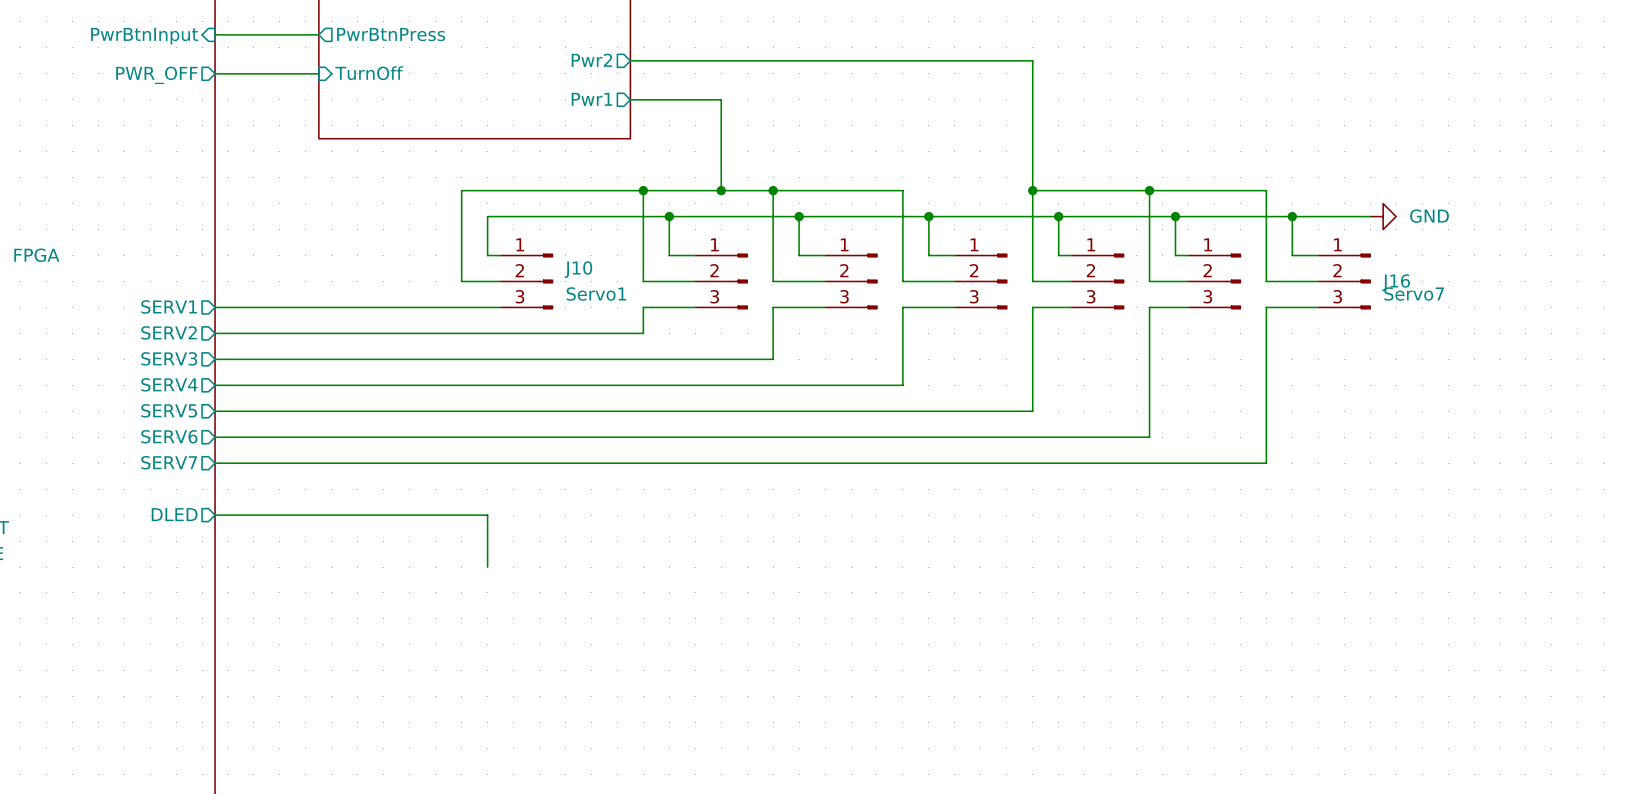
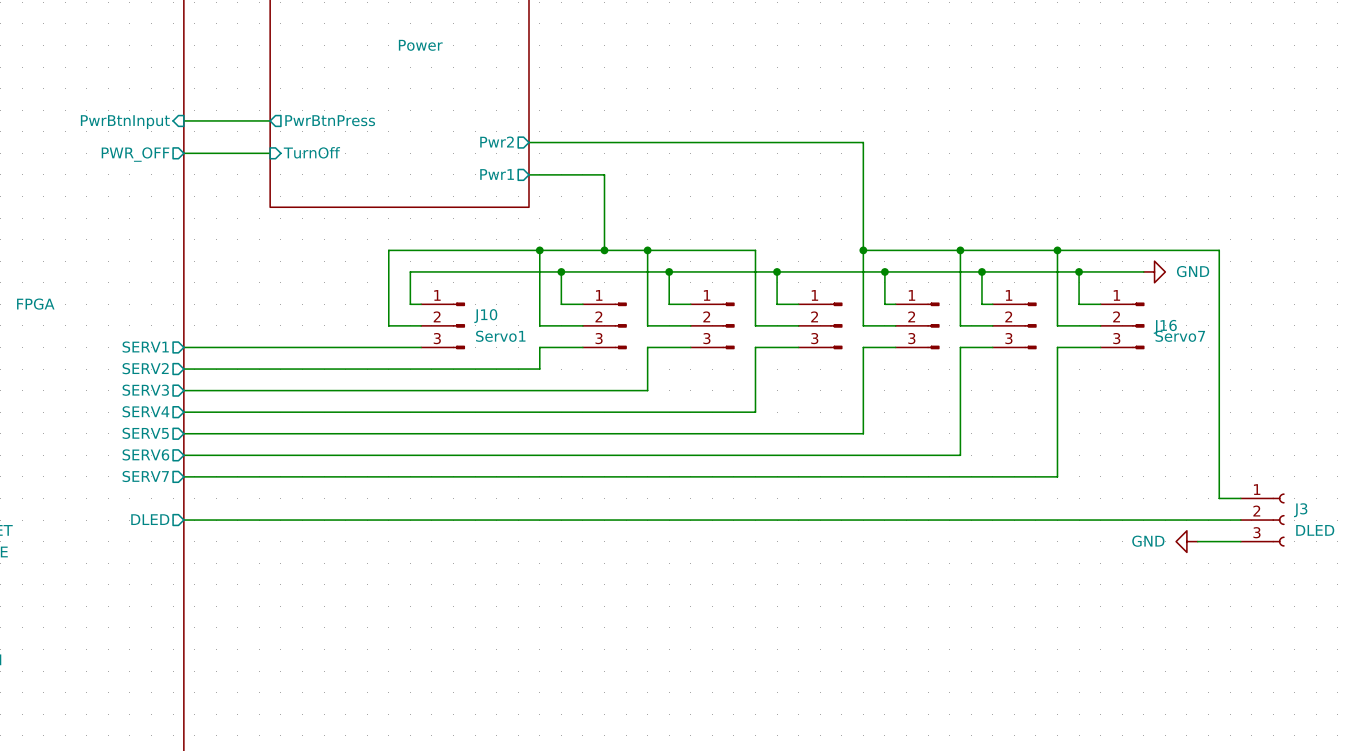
wire: none -> (1057, 250) (1219, 250) (1219, 498) (1240, 498)
junction: none -> (1057, 250)
wire: (487, 515) (487, 567) -> (410, 520) (1240, 520)
J3: none -> DLED (1262, 520)
power symbol: none -> GND (1186, 541)
wire: none -> (1197, 541) (1240, 541)

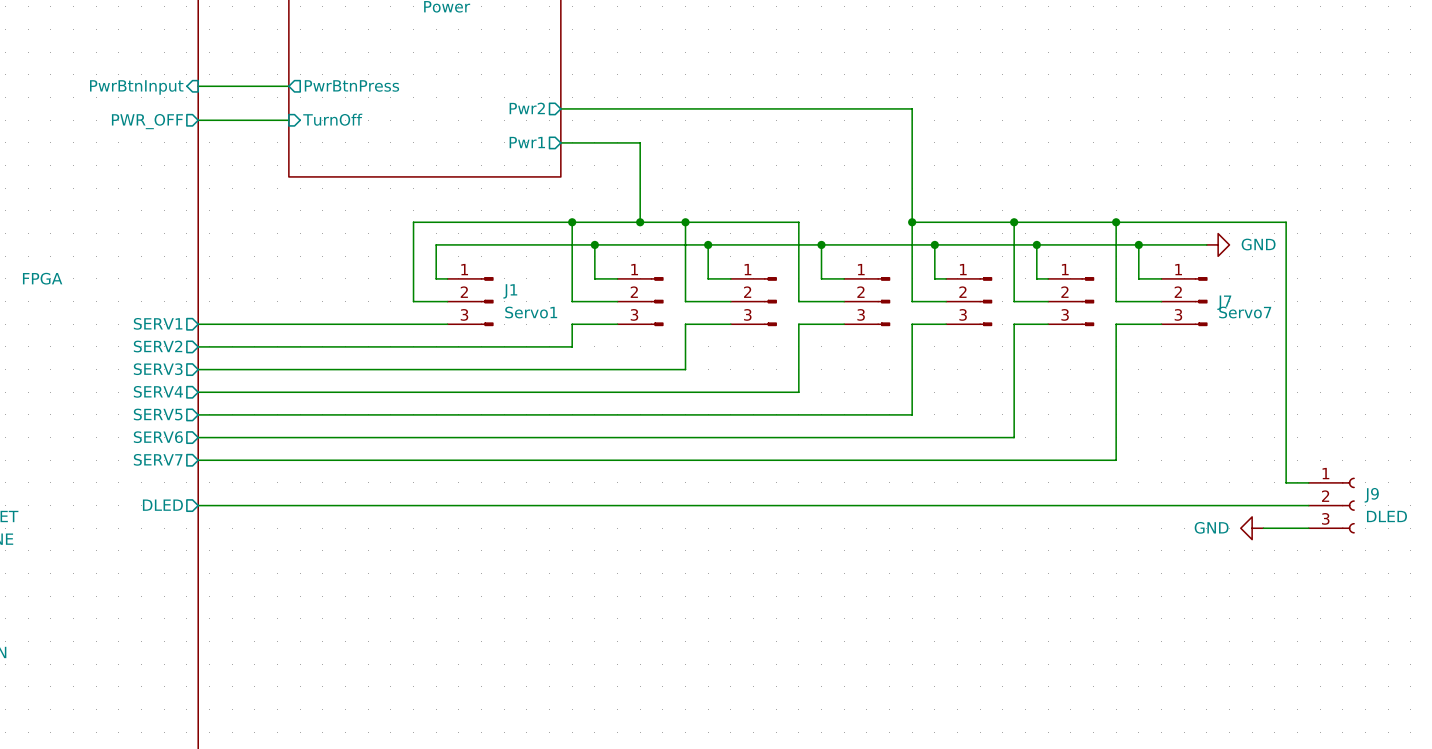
J10 name: J10 (485, 316) -> J1 (510, 291)
J16 name: J16 (1165, 326) -> J7 (1224, 302)
J3 name: J3 (1300, 510) -> J9 (1371, 495)

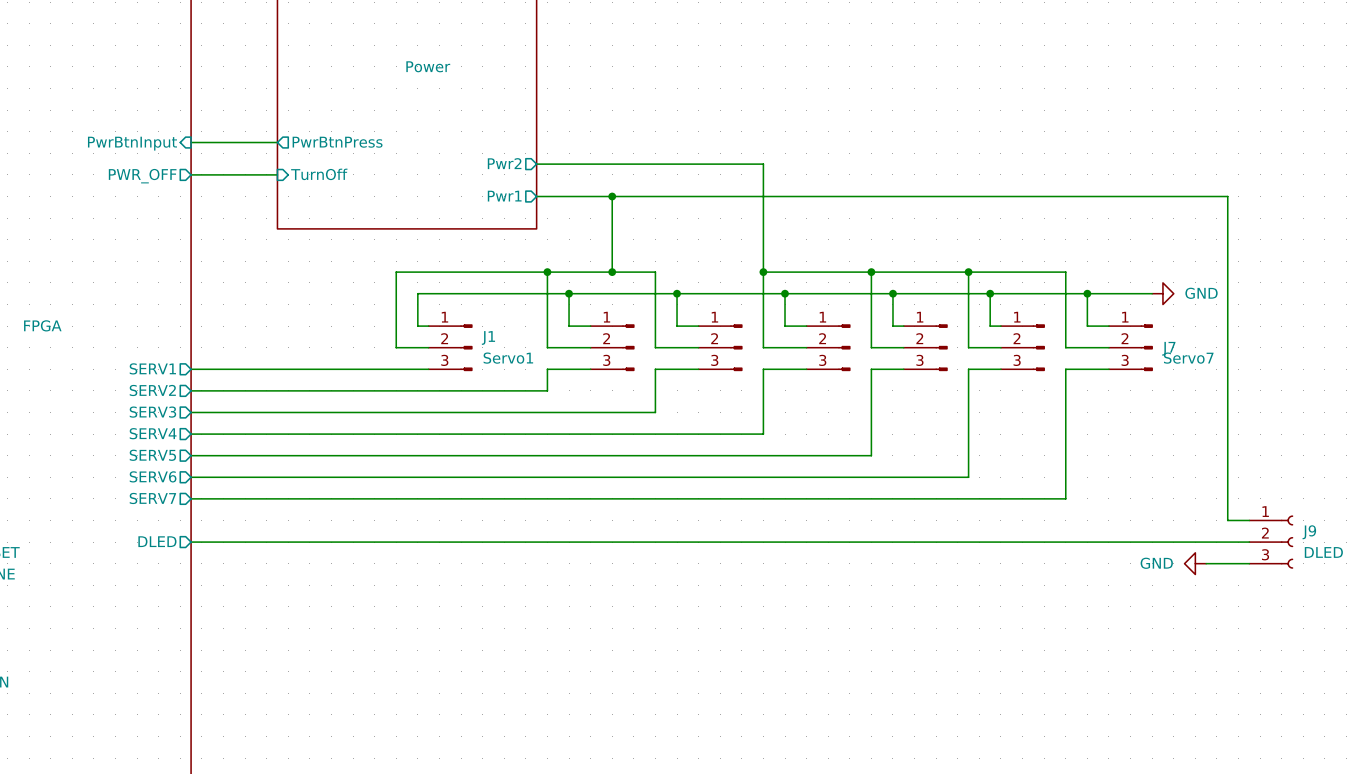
wire: (798, 108) (912, 108) (912, 222) -> (763, 164) (763, 272) (871, 272)
junction: none -> (612, 196)
wire: (685, 222) (798, 222) -> none
junction: (685, 222) -> none
junction: none -> (763, 272)
wire: (1116, 222) (1286, 222) -> (612, 196) (1227, 196) (1227, 272)
junction: (1116, 222) -> none

